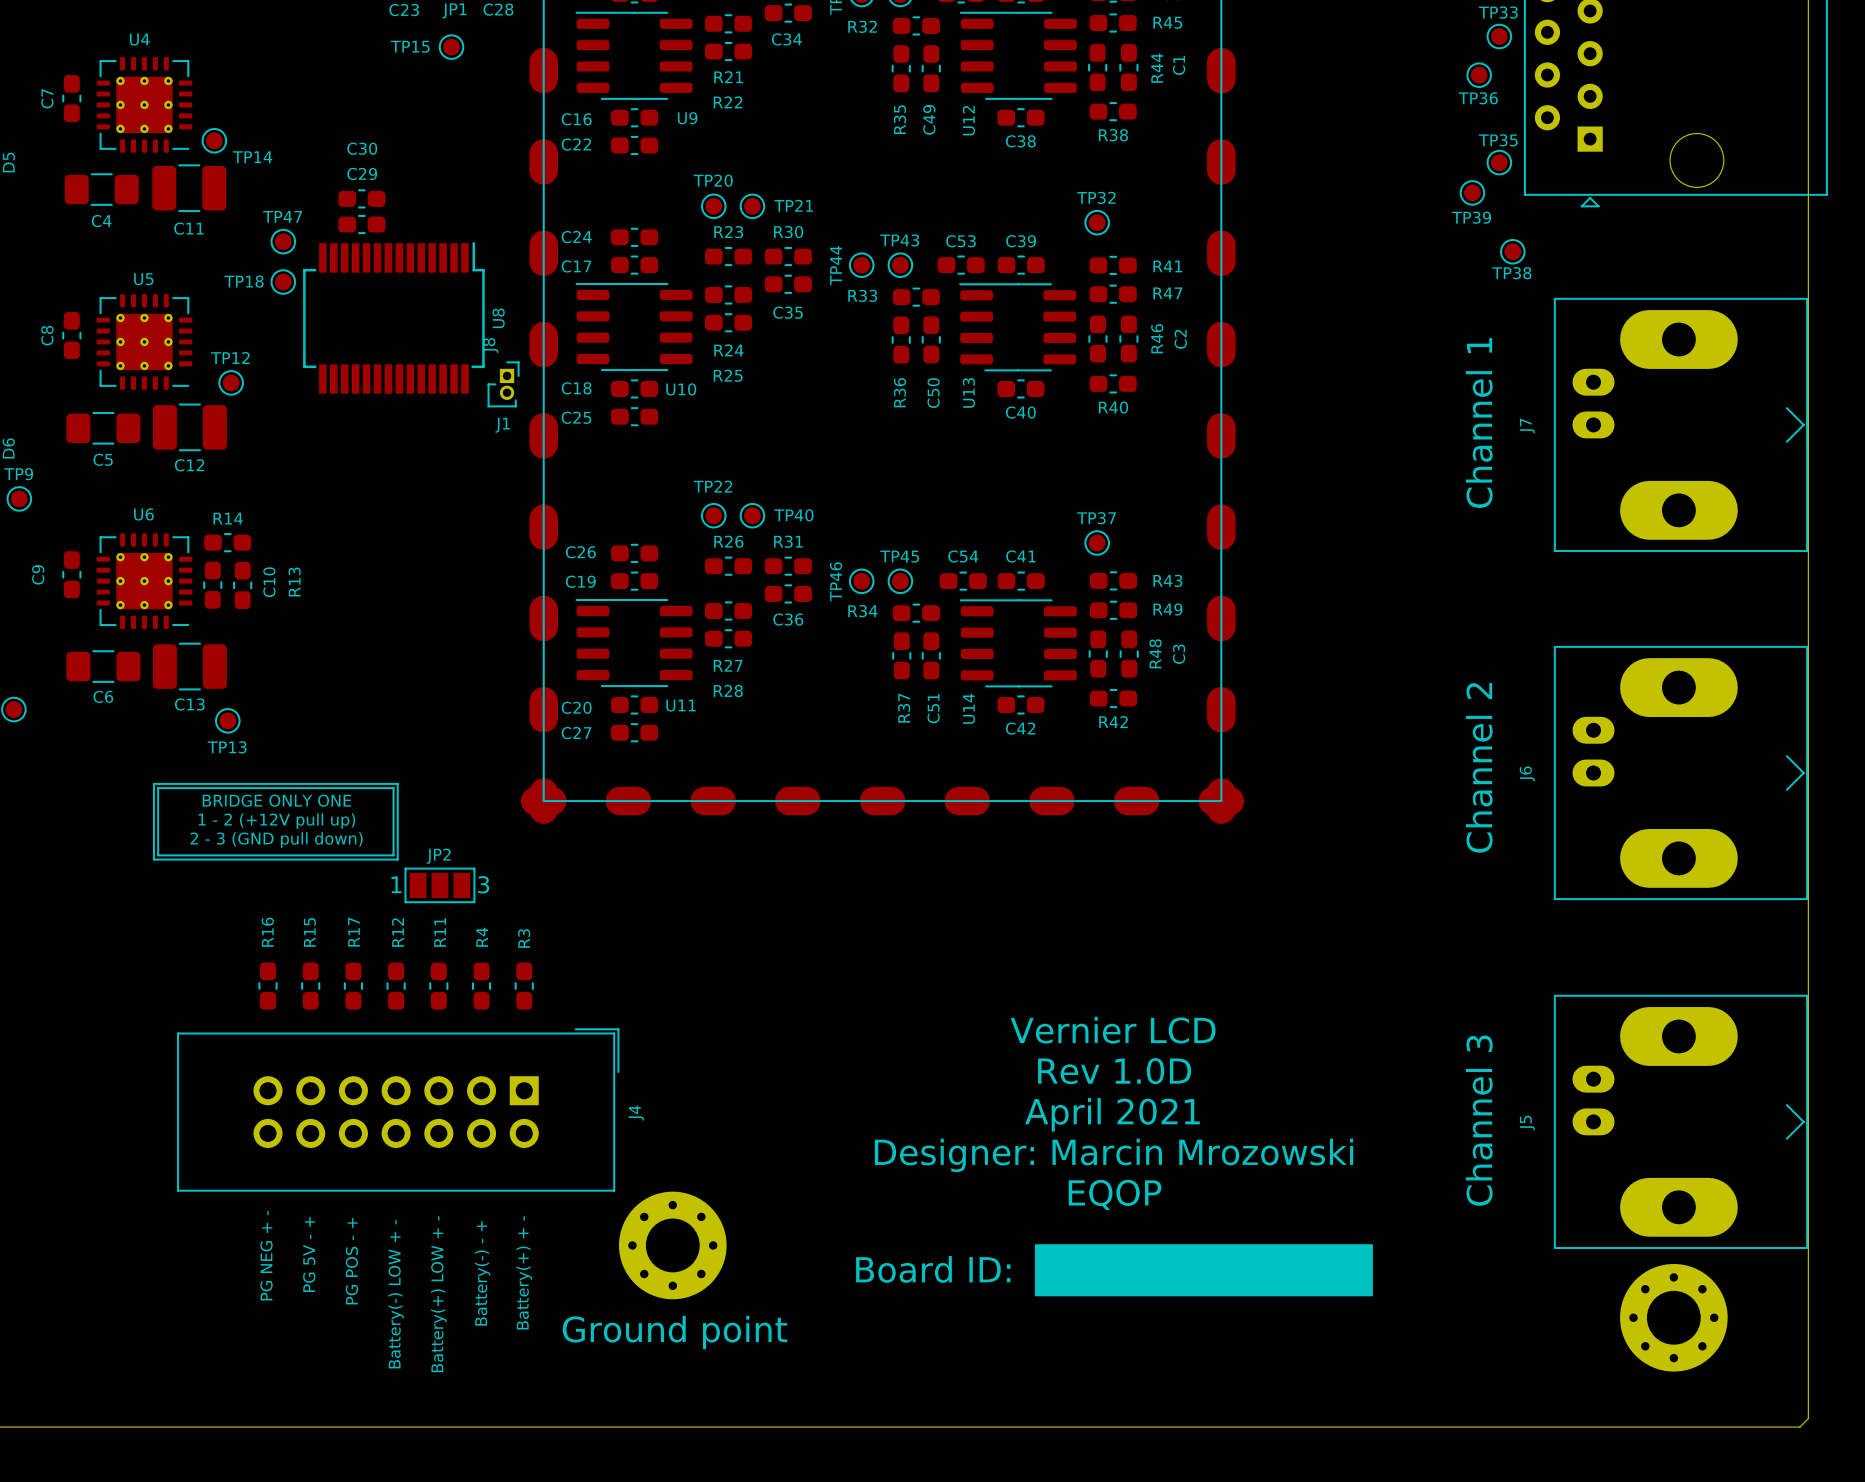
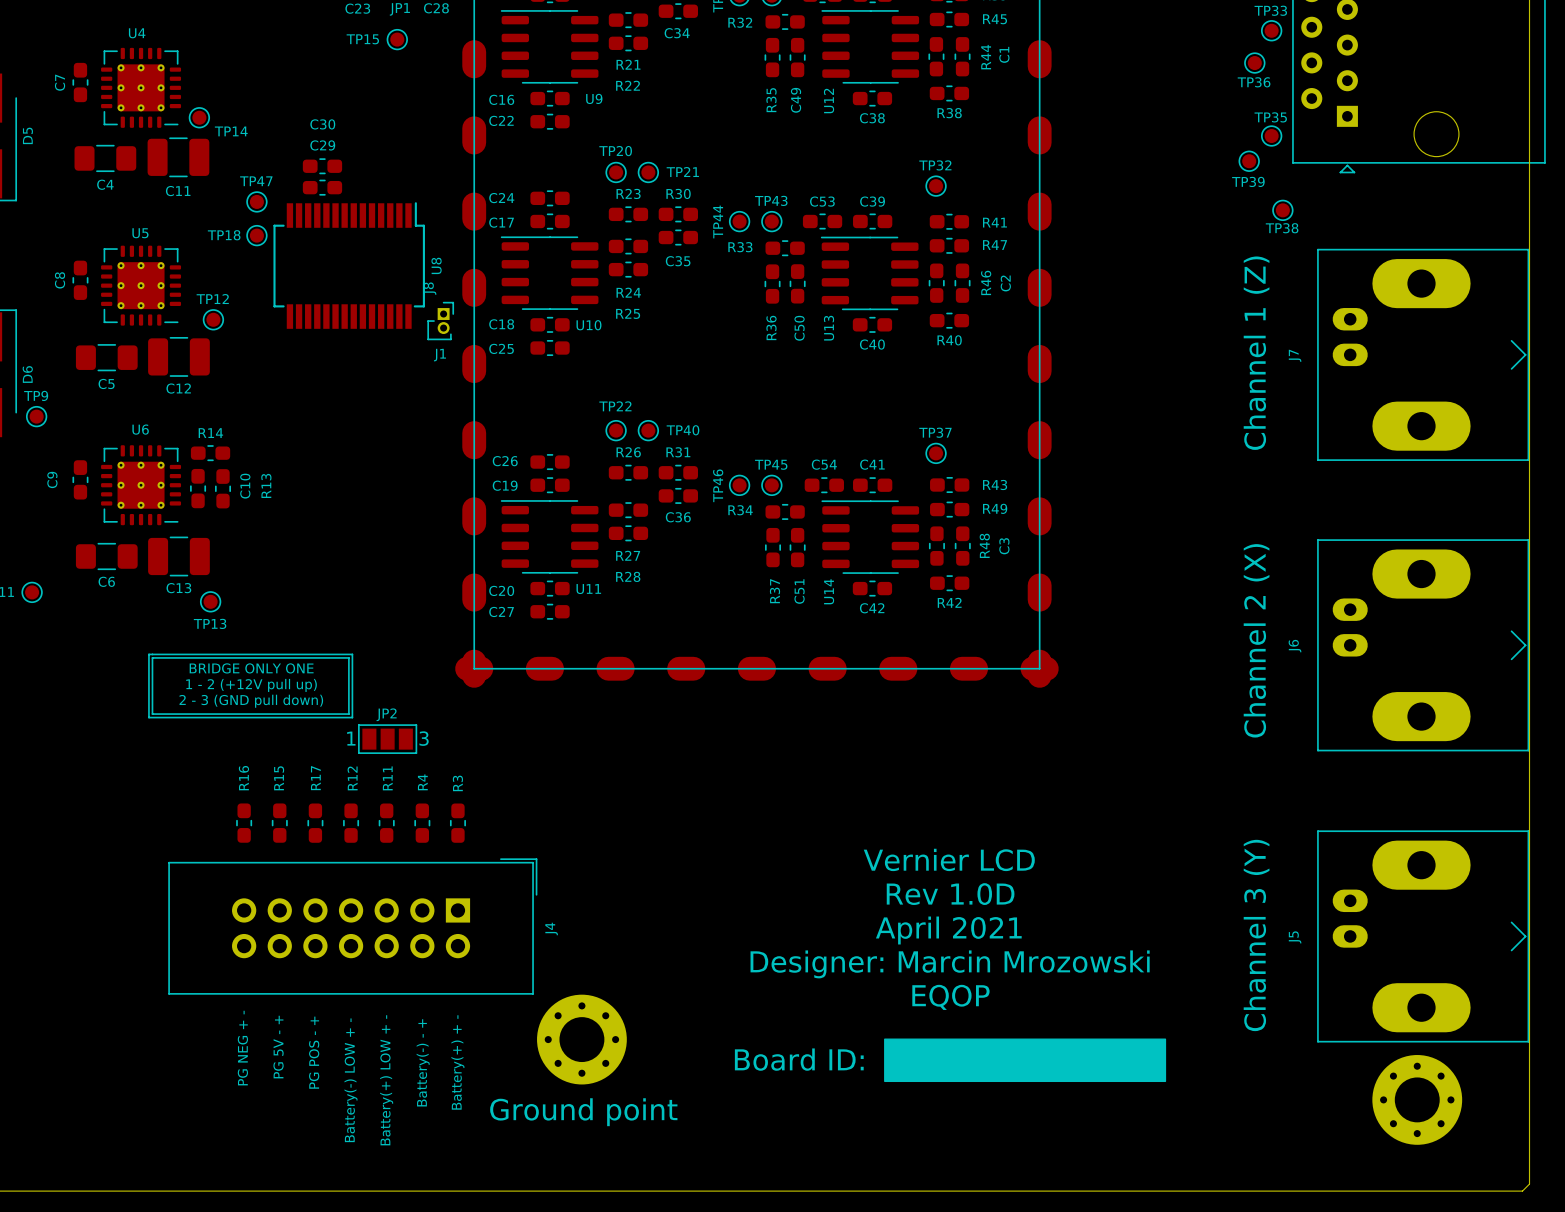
text: Channel 1 (1479, 423) -> Channel 1 (Z) (1256, 353)
text: Channel 2 (1479, 767) -> Channel 2 (X) (1256, 640)
text: Channel 3 (1479, 1120) -> Channel 3 (Y) (1256, 935)

